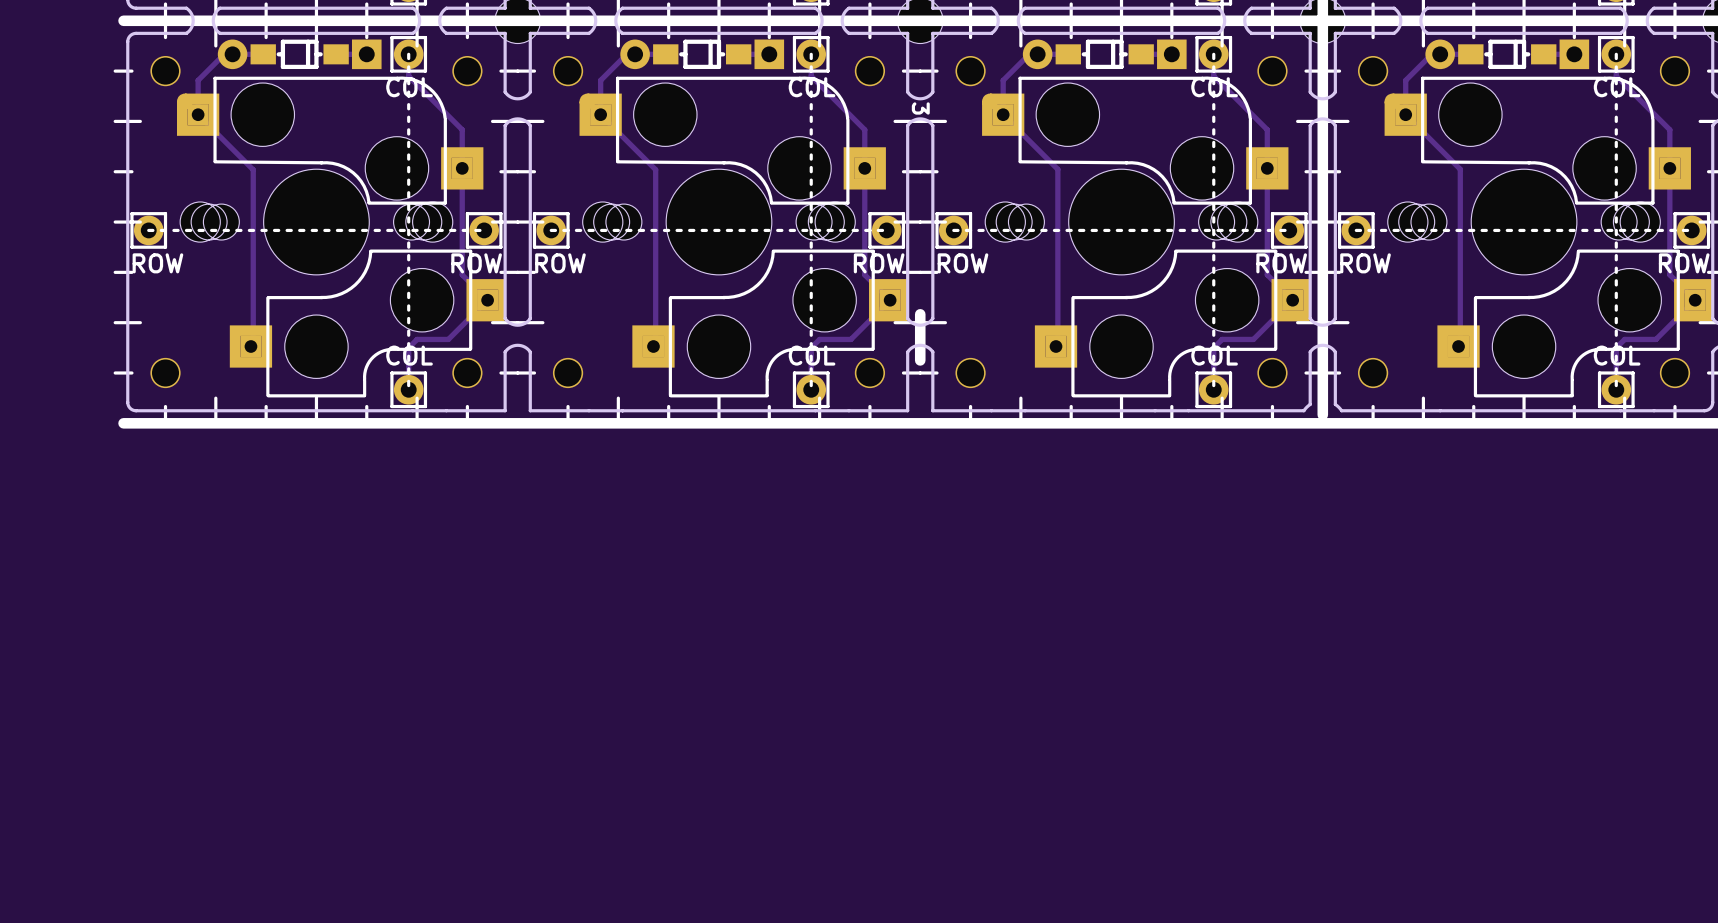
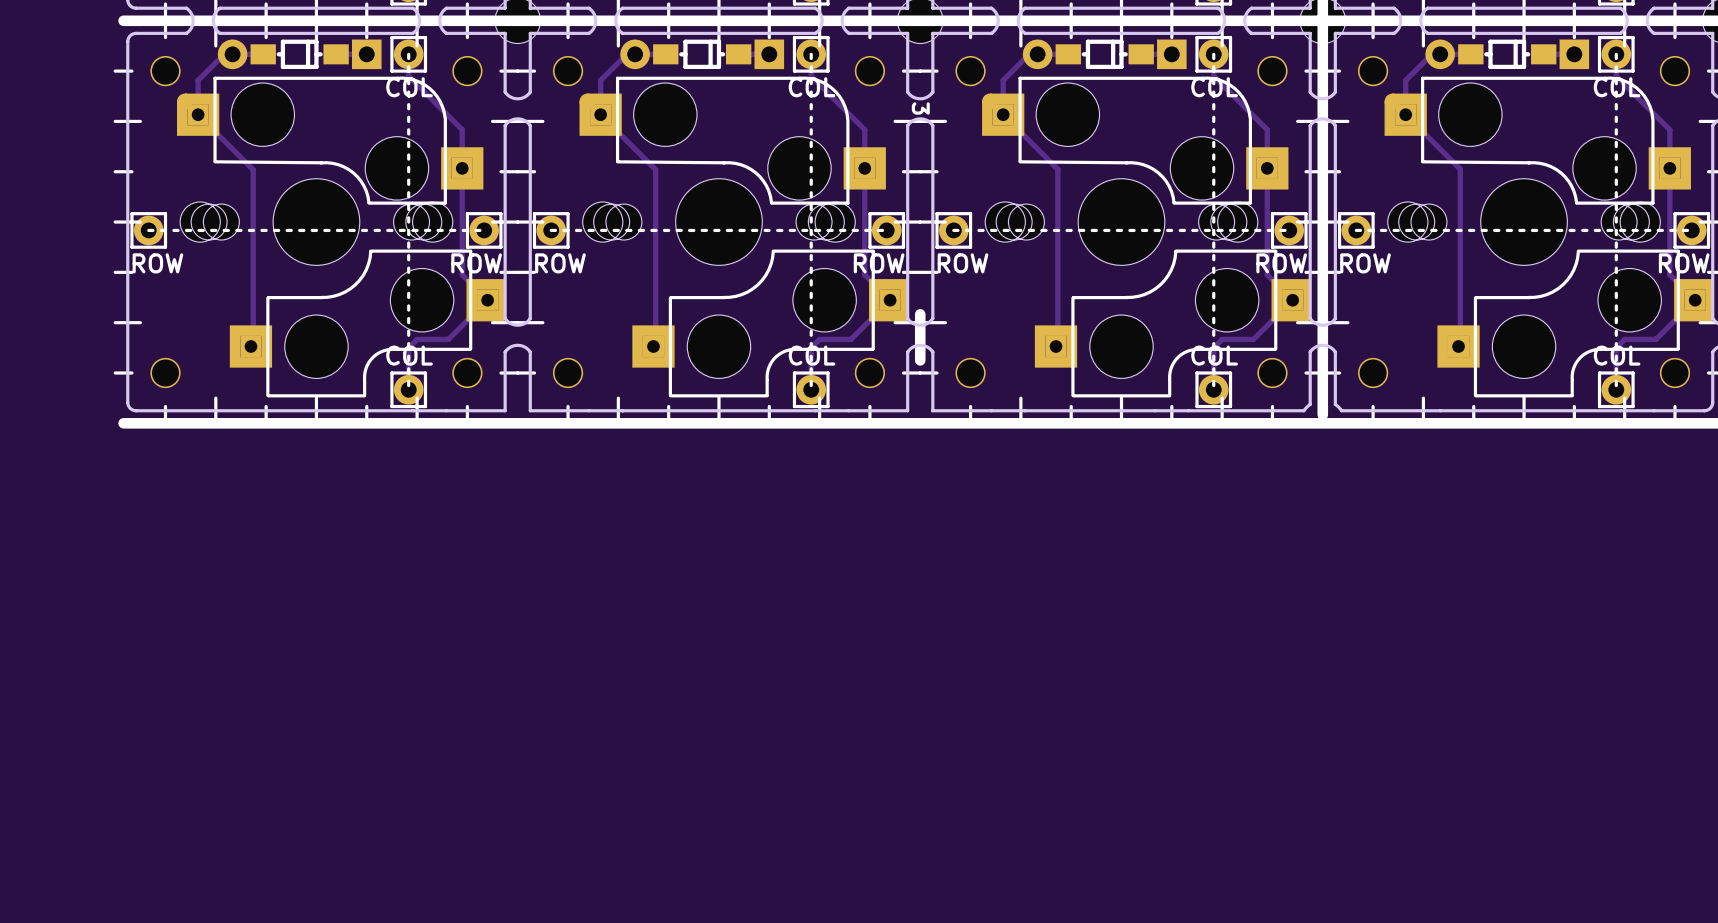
part footprint: [176, 76, 505, 398] -> [176, 76, 505, 398]
part footprint: [579, 76, 908, 398] -> [579, 76, 908, 398]
part footprint: [982, 76, 1310, 398] -> [982, 76, 1310, 398]
part footprint: [1384, 76, 1713, 398] -> [1384, 76, 1713, 398]

